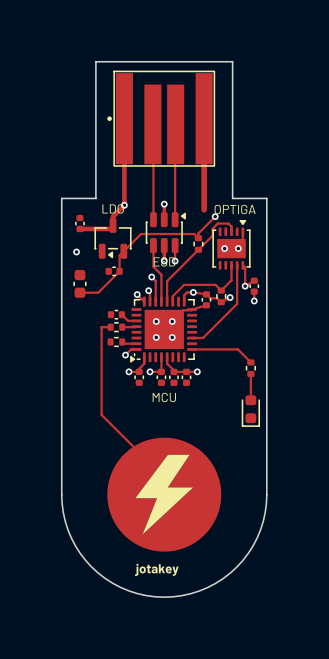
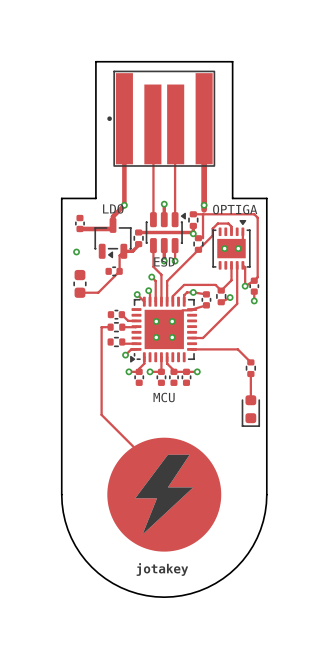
via: none -> (204, 205)
track: none -> (193, 214) (254, 214) (257, 217) (257, 277) (254, 280)
track: none -> (203, 214) (203, 238)
track: (215, 216) (198, 233) (198, 238) (194, 234) (141, 234) (123, 251) -> (138, 244) (132, 251) (123, 251)
via: (215, 216) -> none
part: none -> (193, 220)
track: none -> (193, 225) (193, 233) (138, 232)
via: none -> (193, 233)
part: none -> (138, 238)
track: (206, 294) (210, 298) (217, 298) (221, 302) -> none

